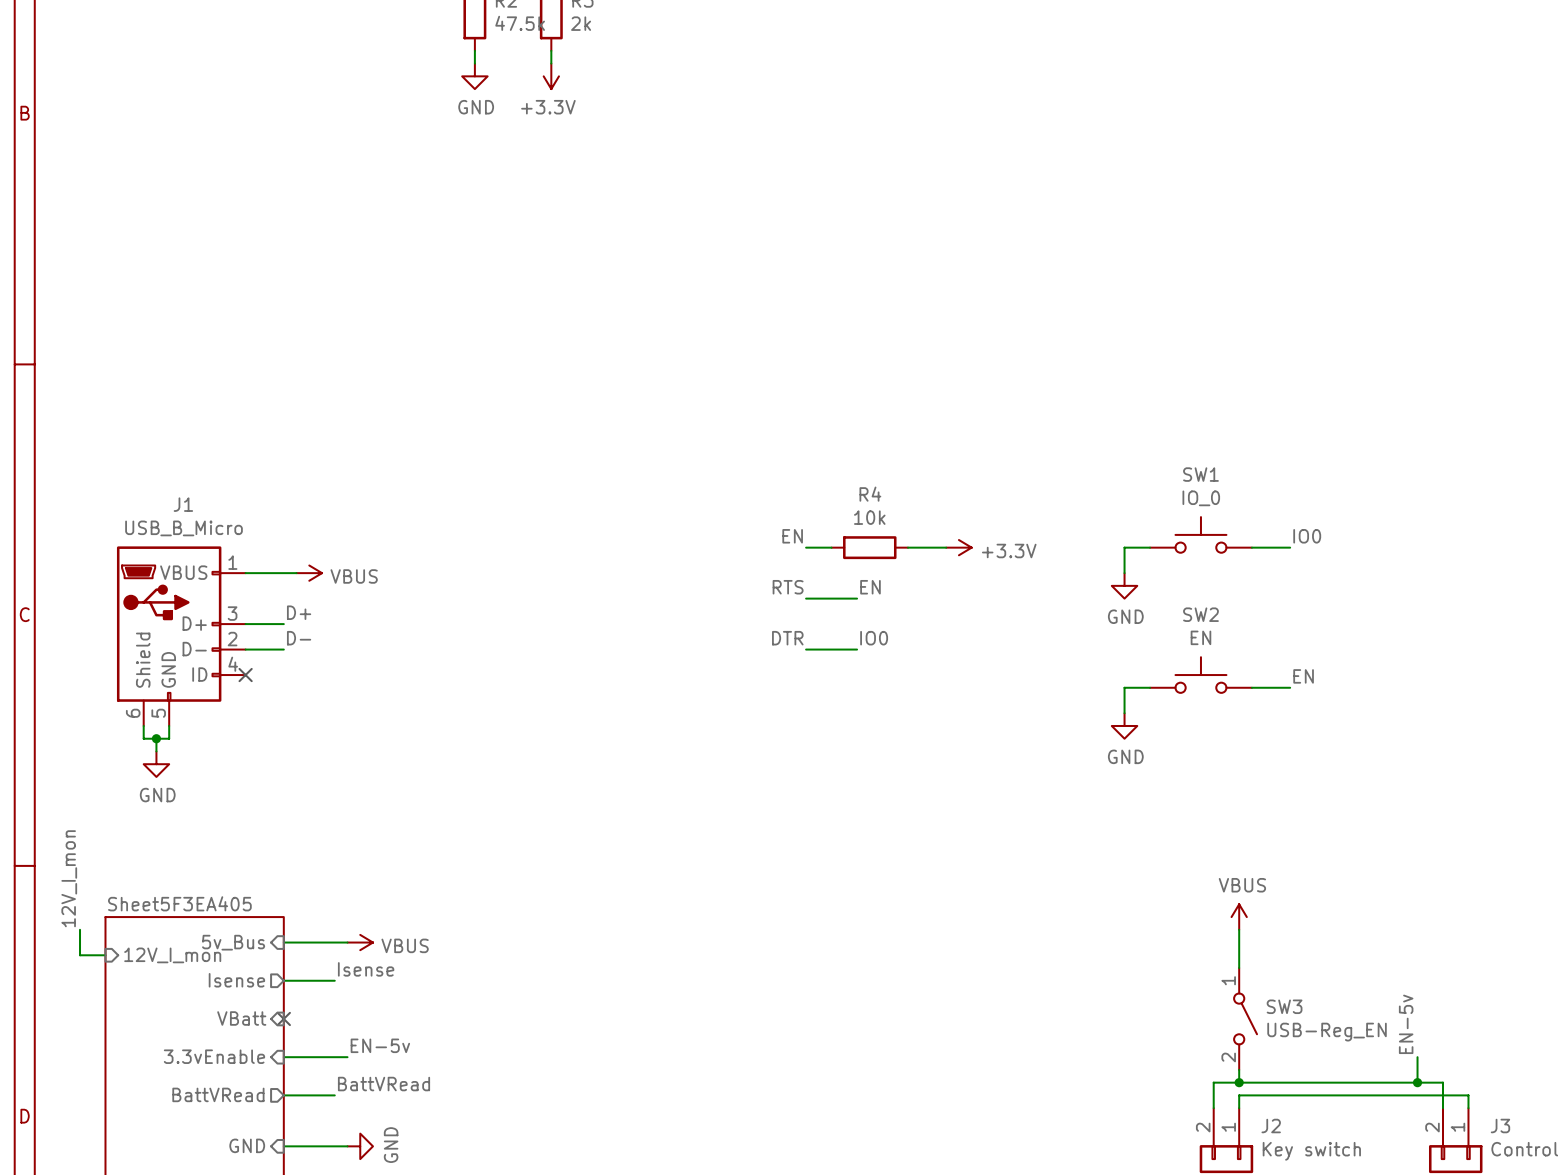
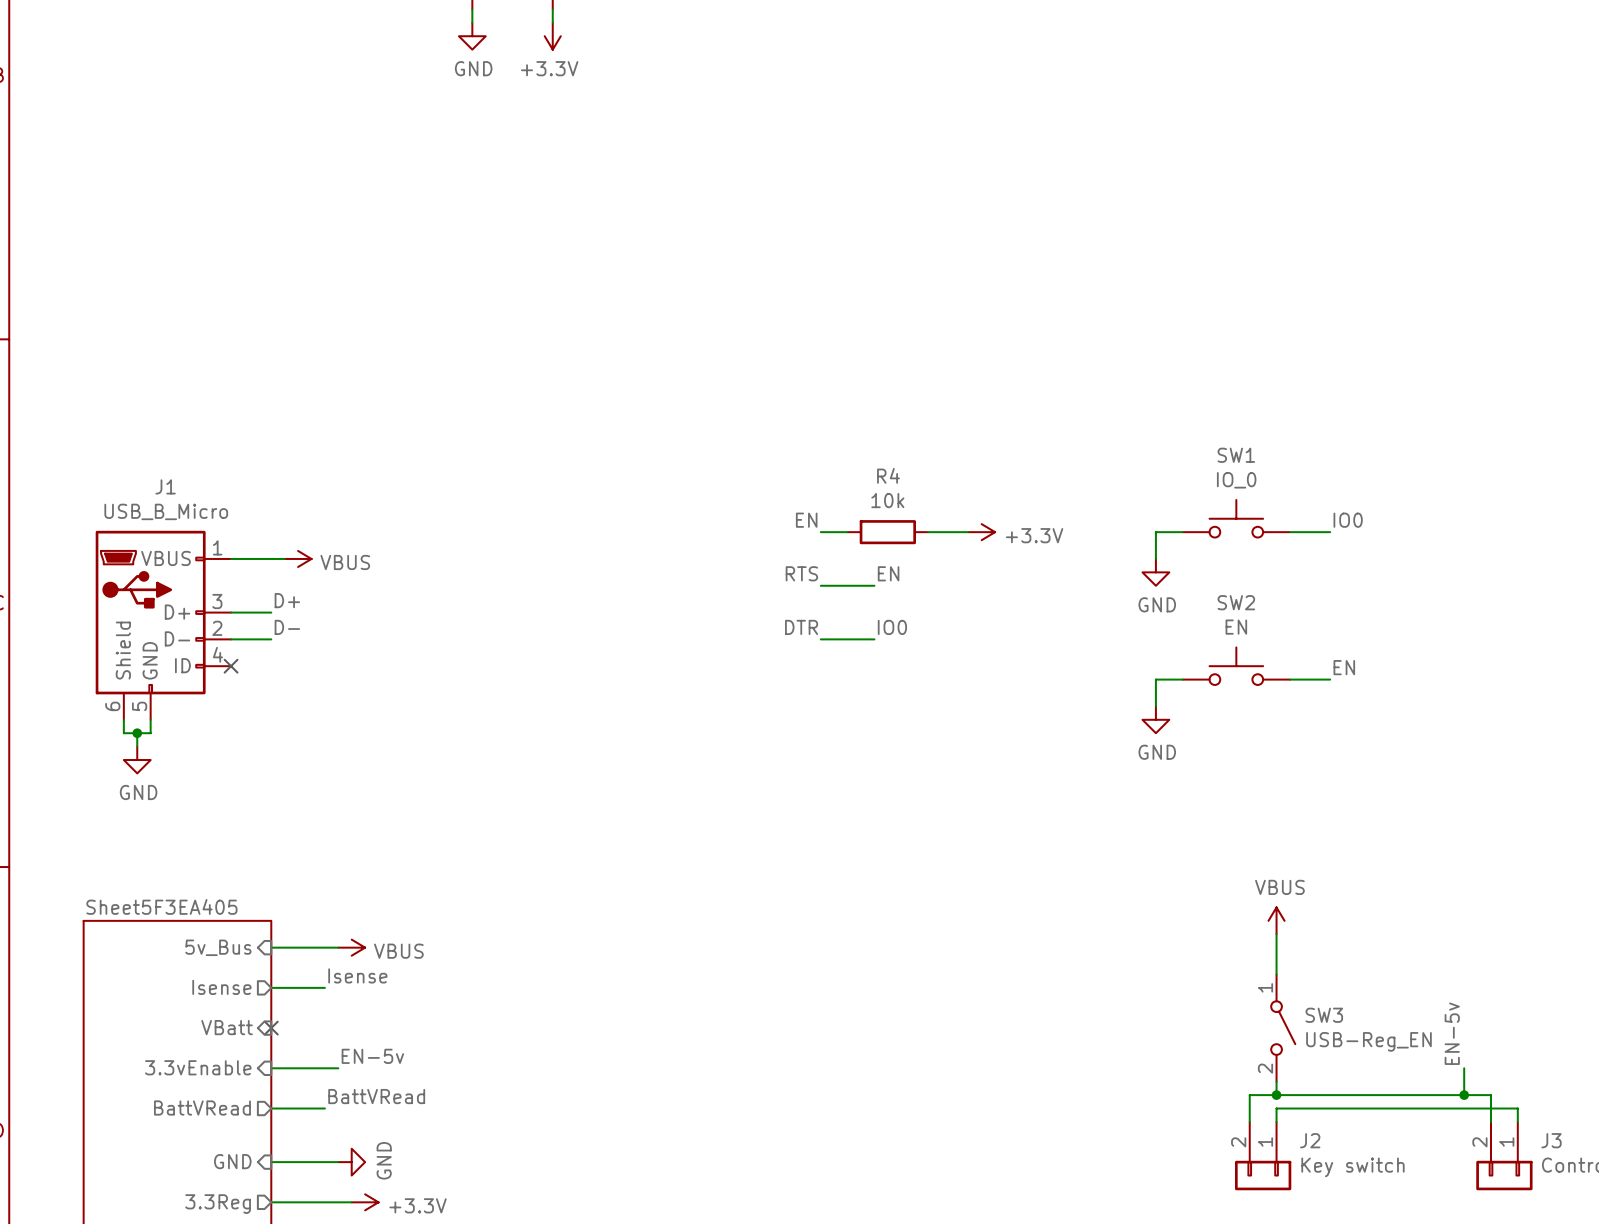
label: 12V_I_mon (69, 878) -> none
wire: (80, 929) (80, 955) (105, 955) -> none
sheet pin: 12V_I_mon (172, 955) -> none

